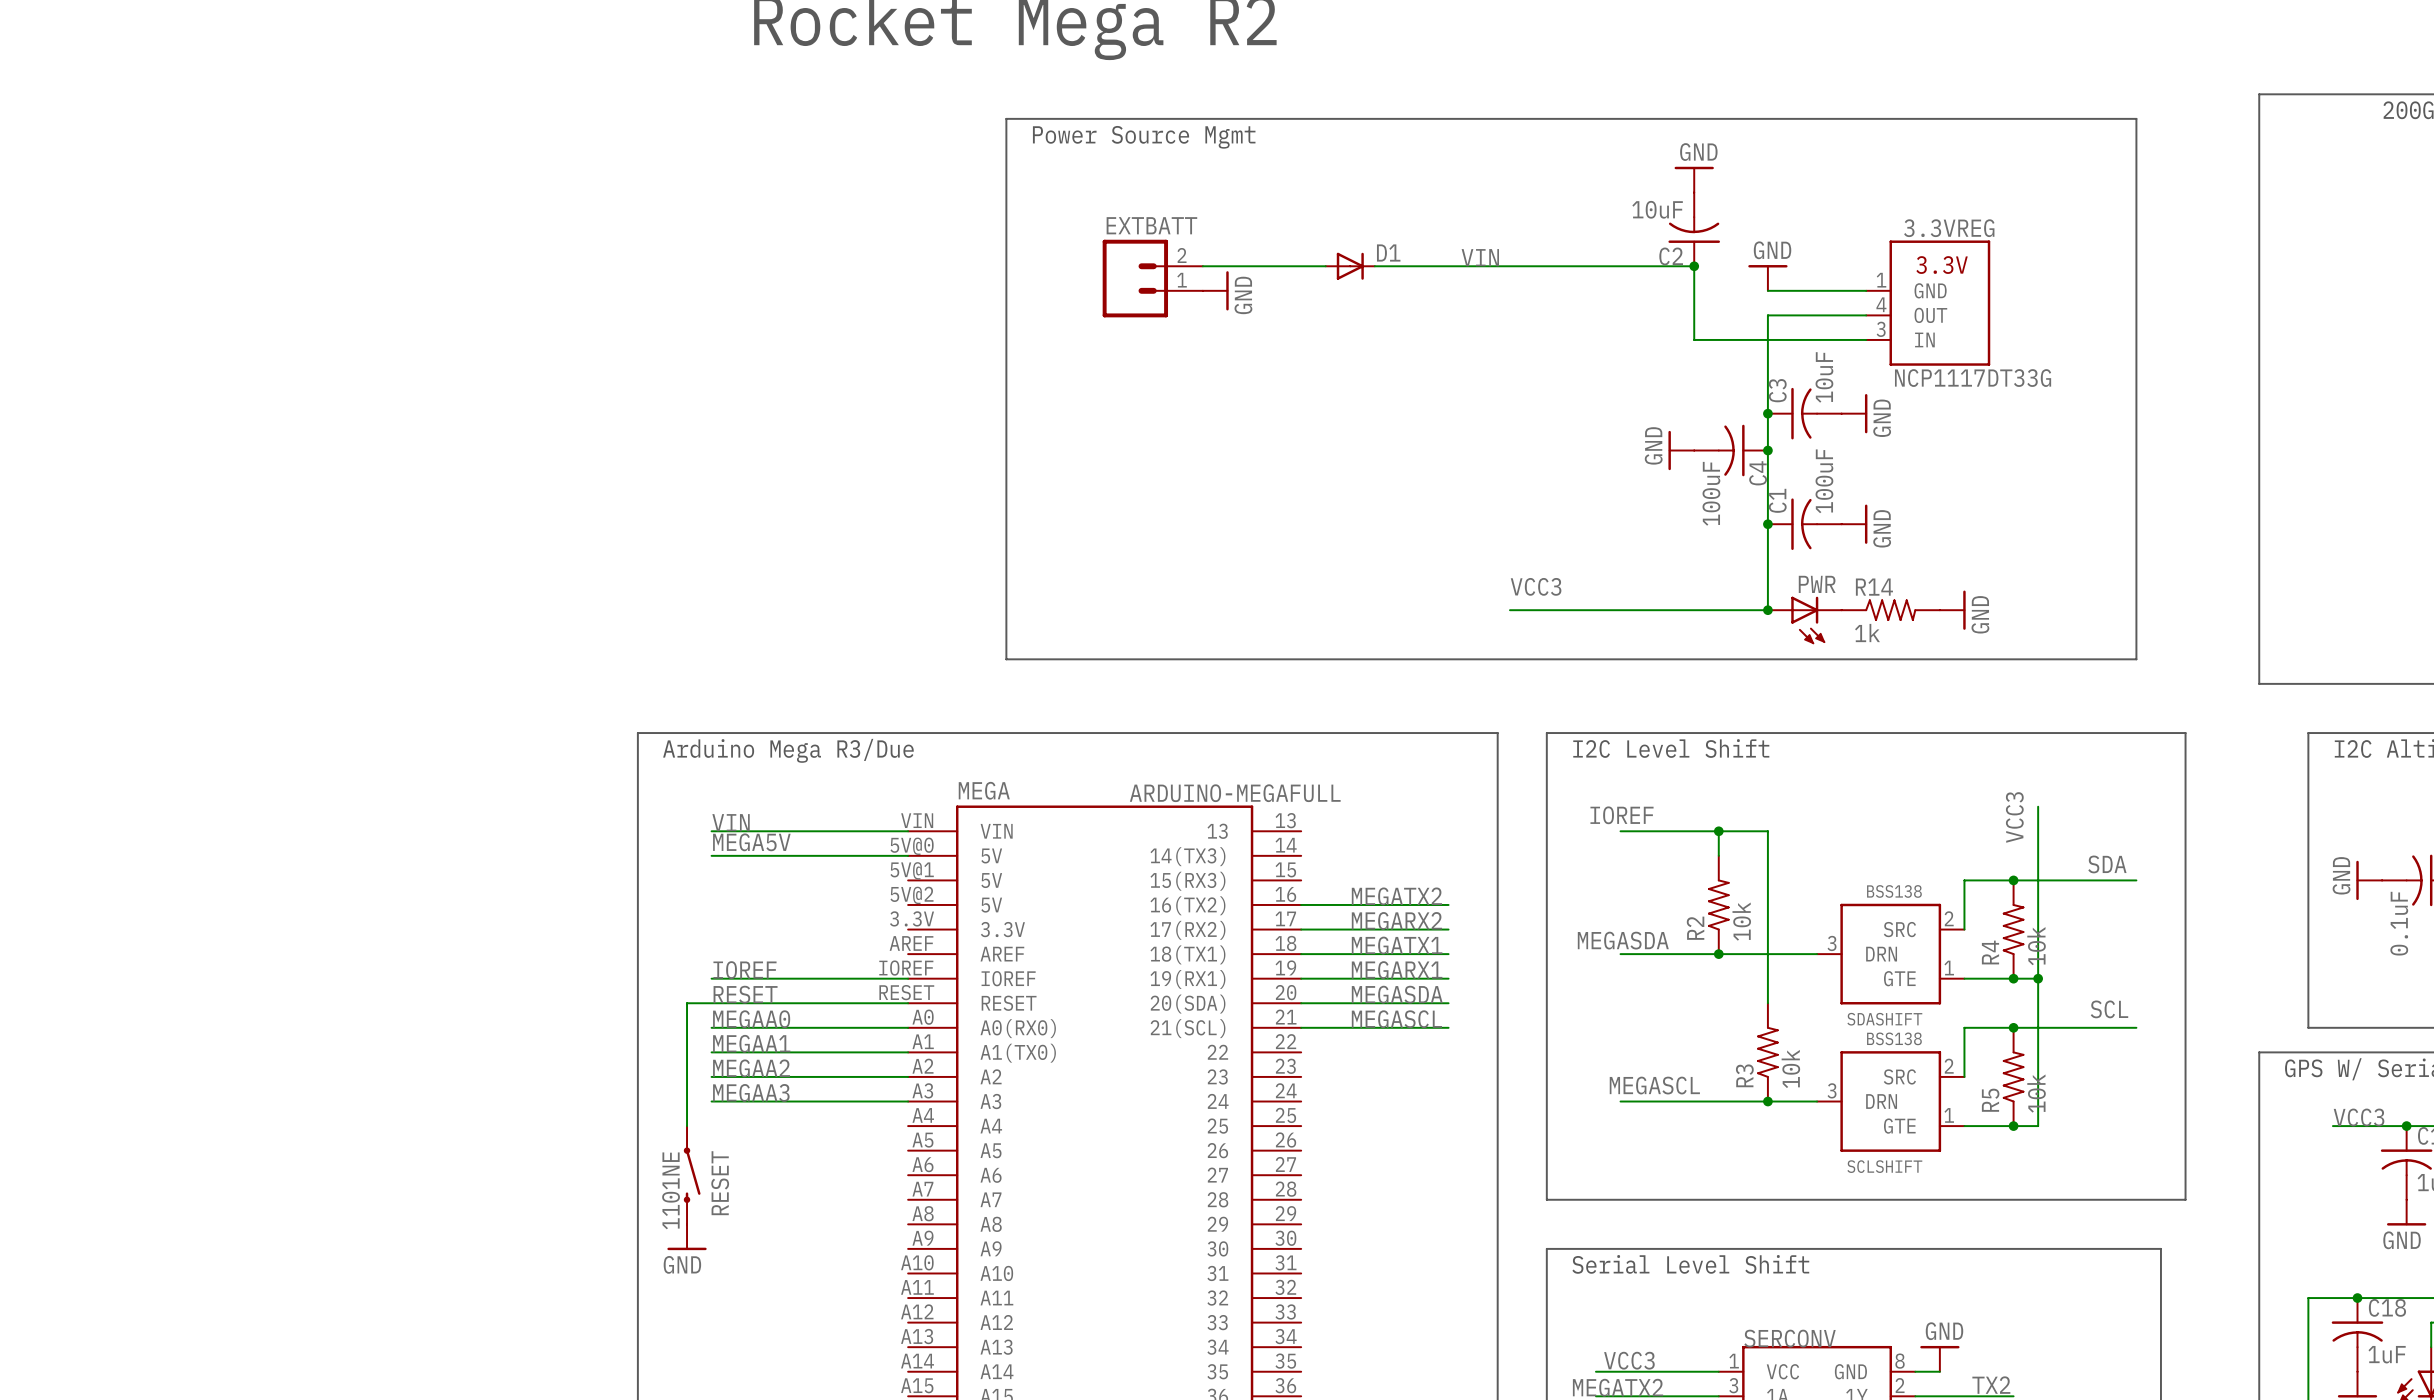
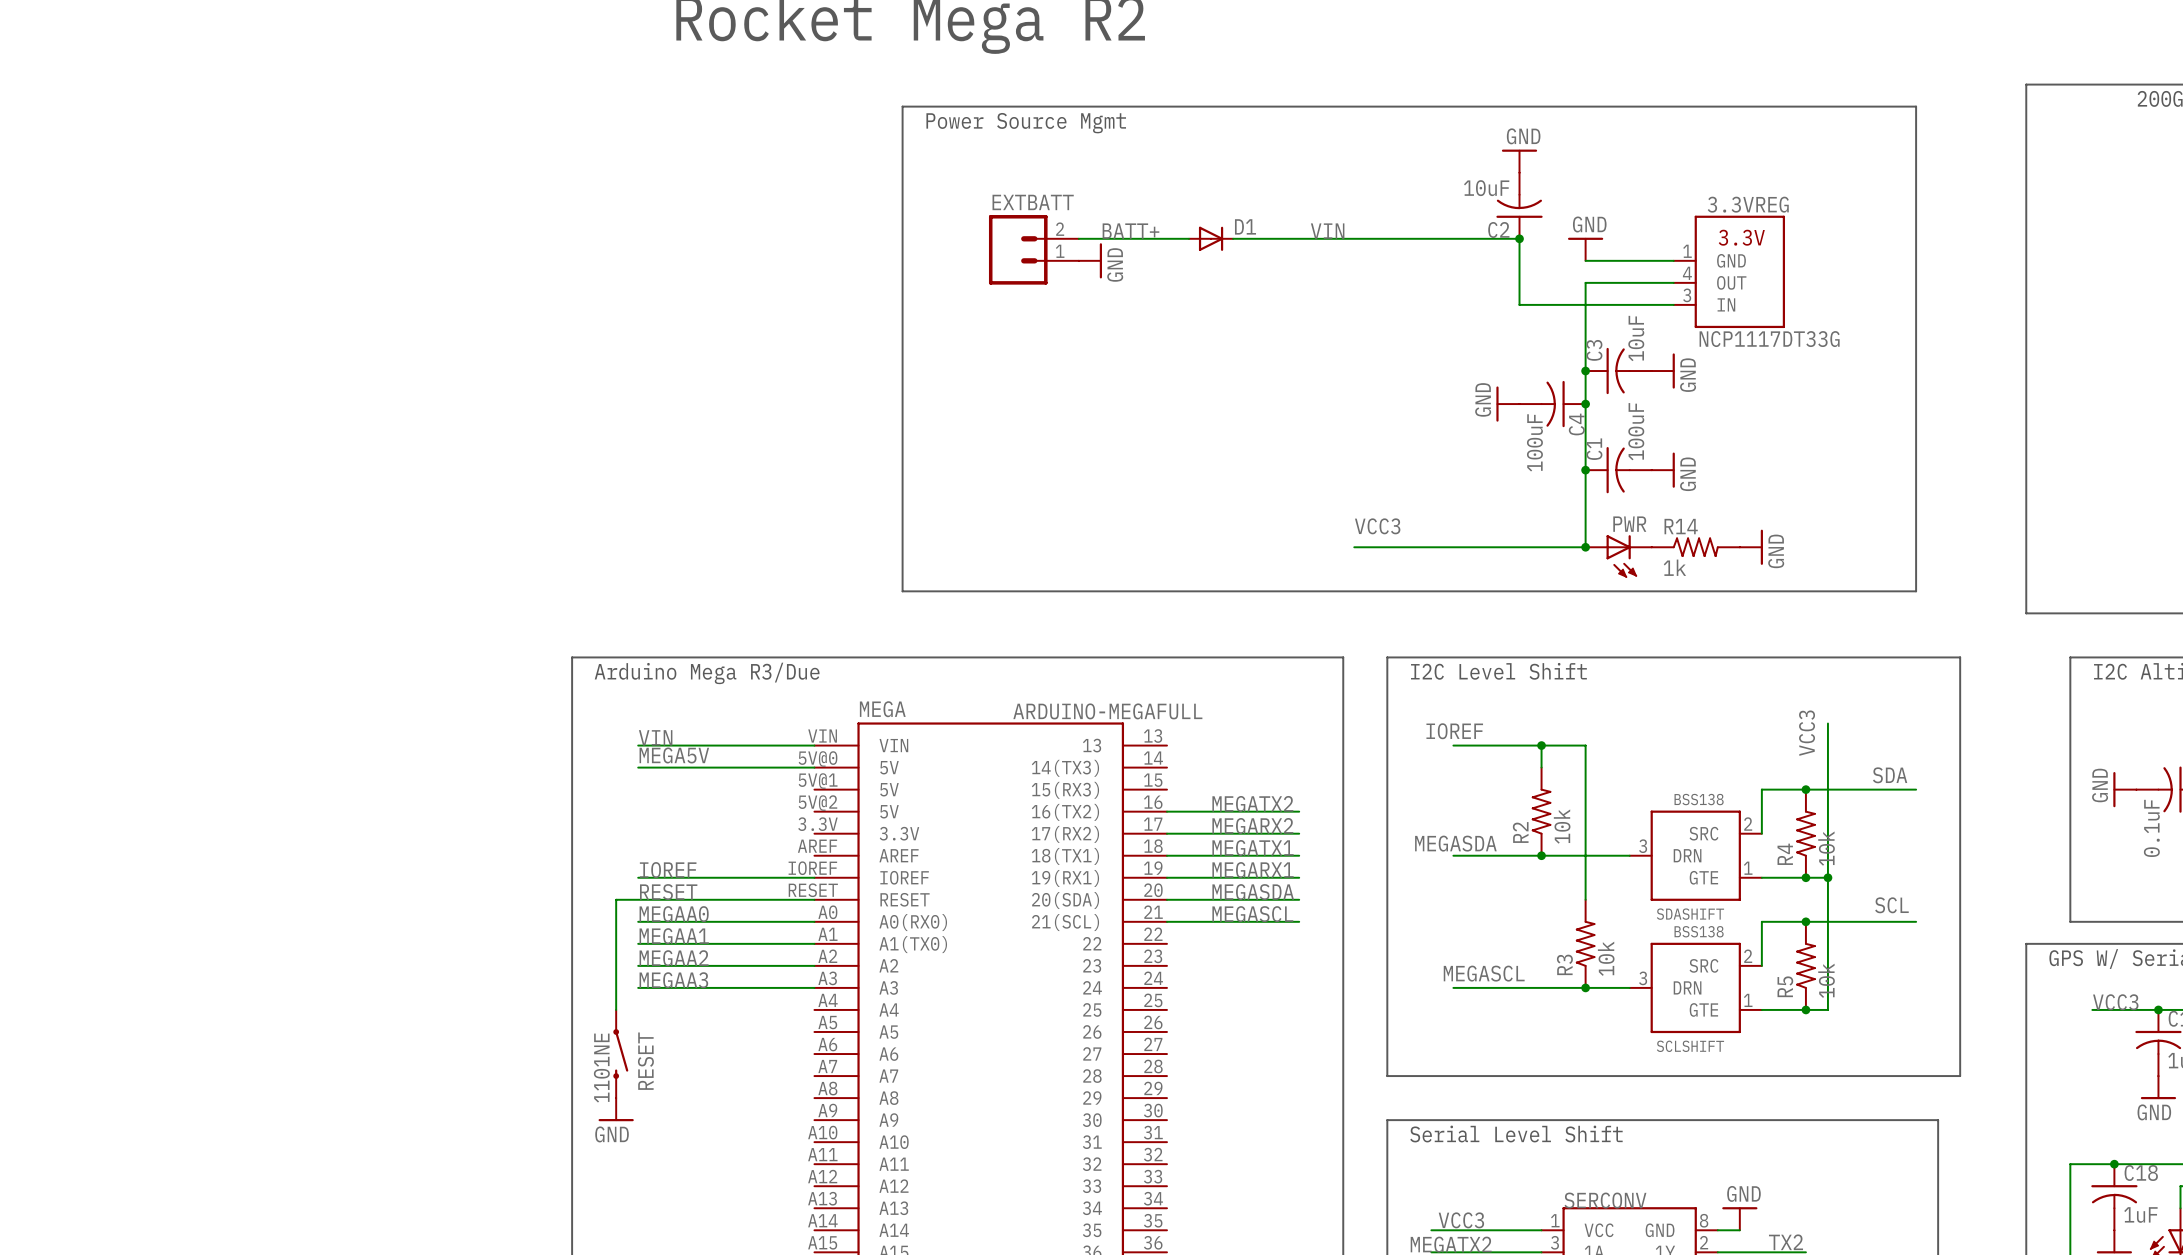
label: none -> BATT+ (1130, 231)

